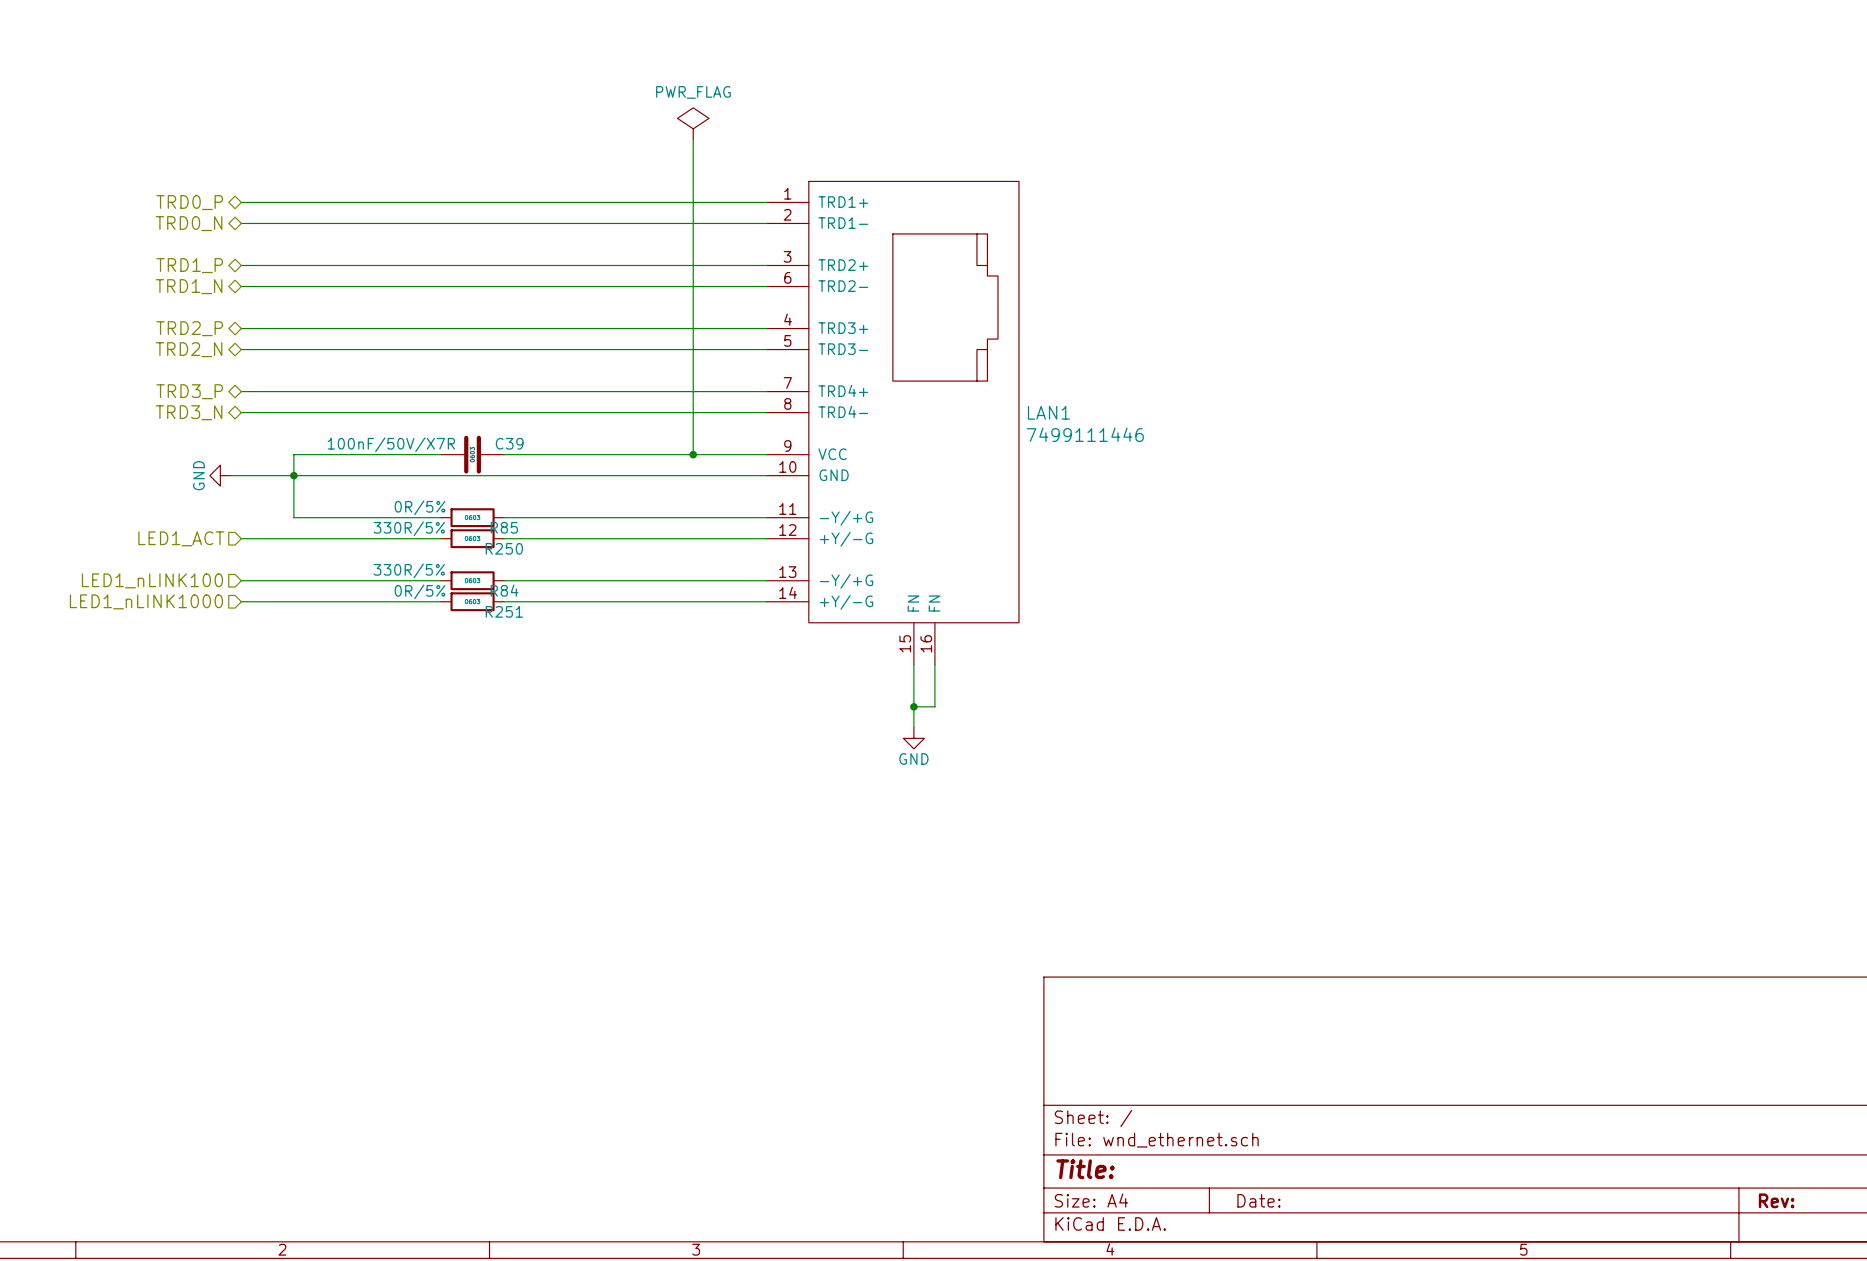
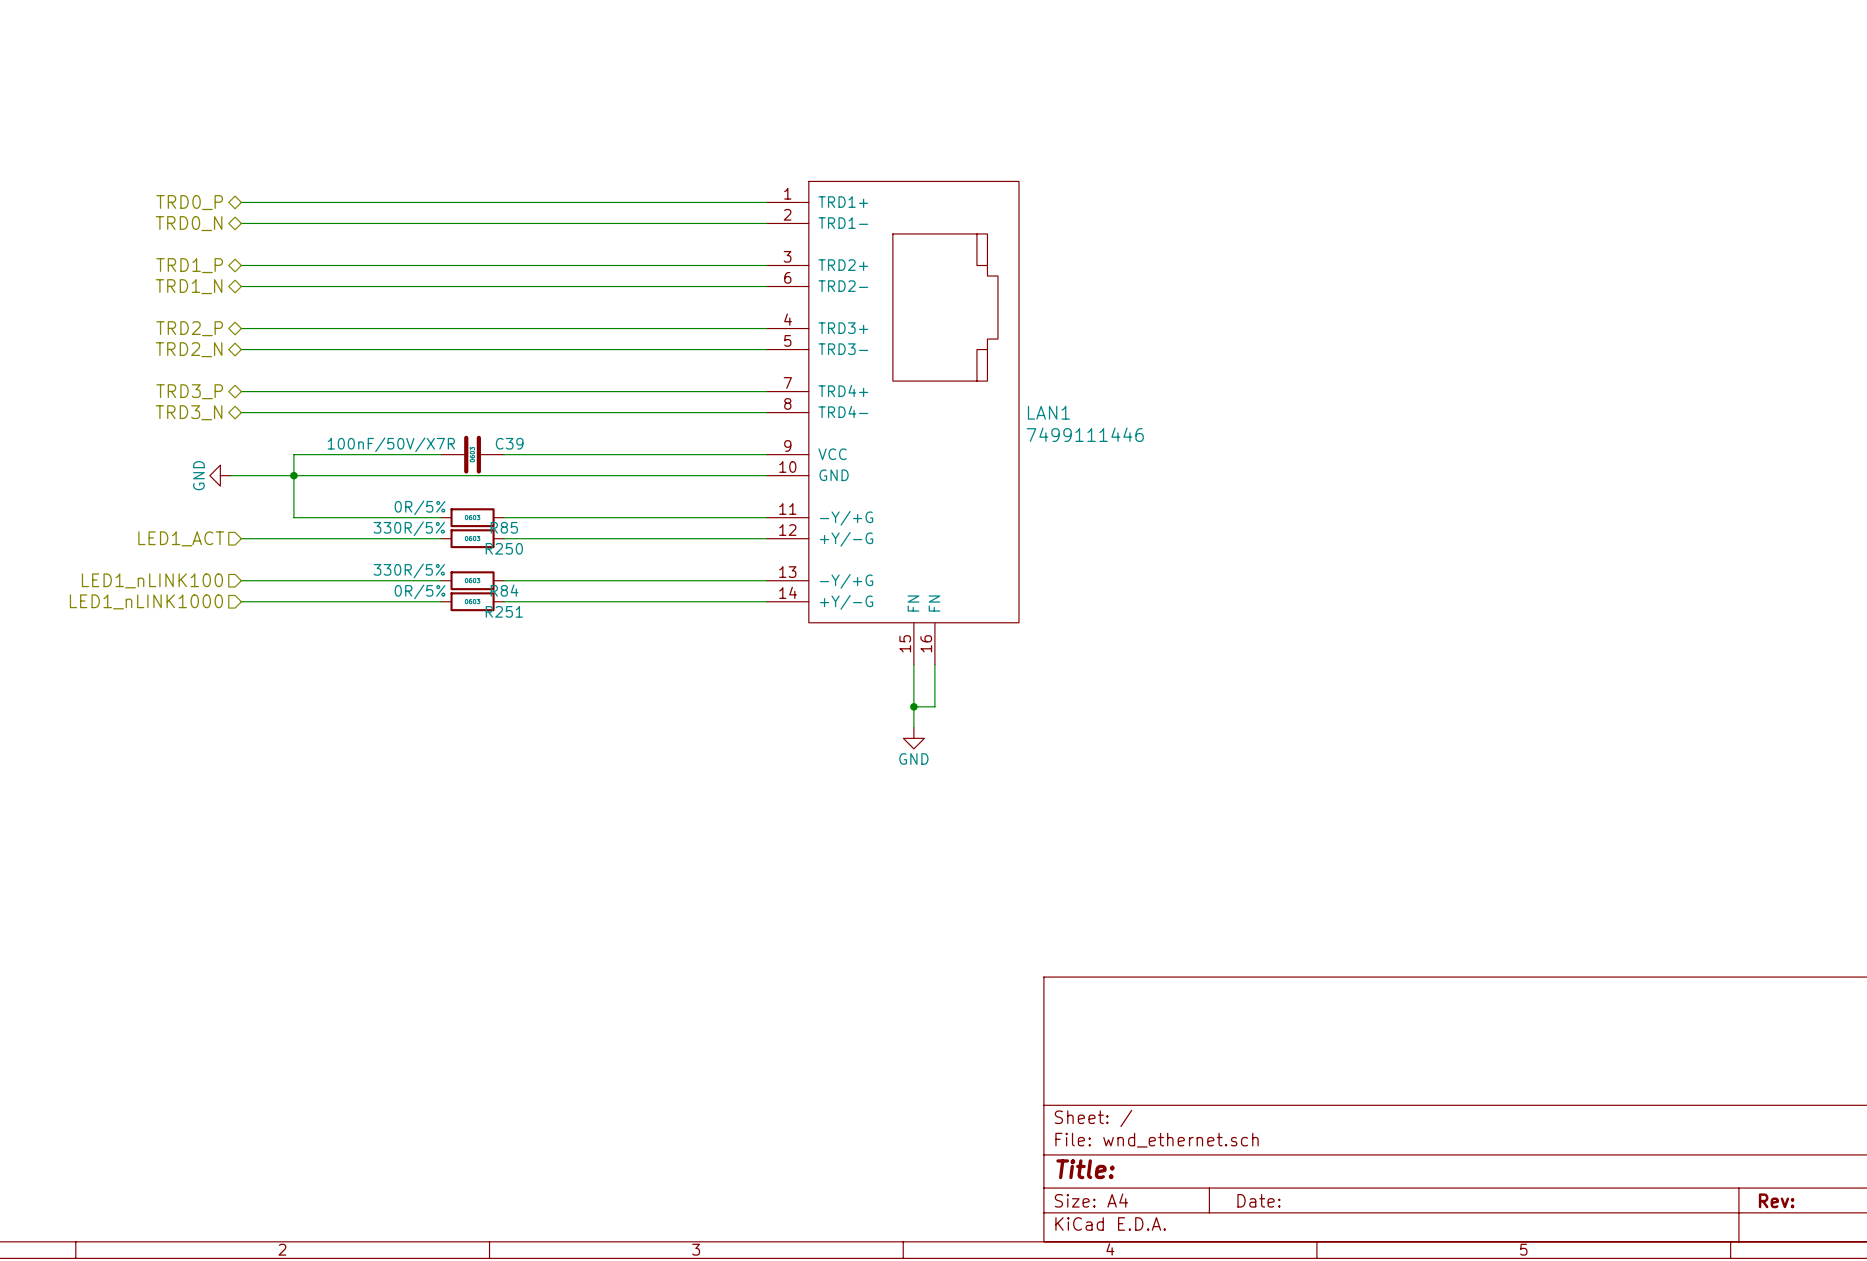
power symbol: PWR_FLAG (693, 123) -> none
wire: (693, 139) (693, 454) -> none
junction: (693, 454) -> none

